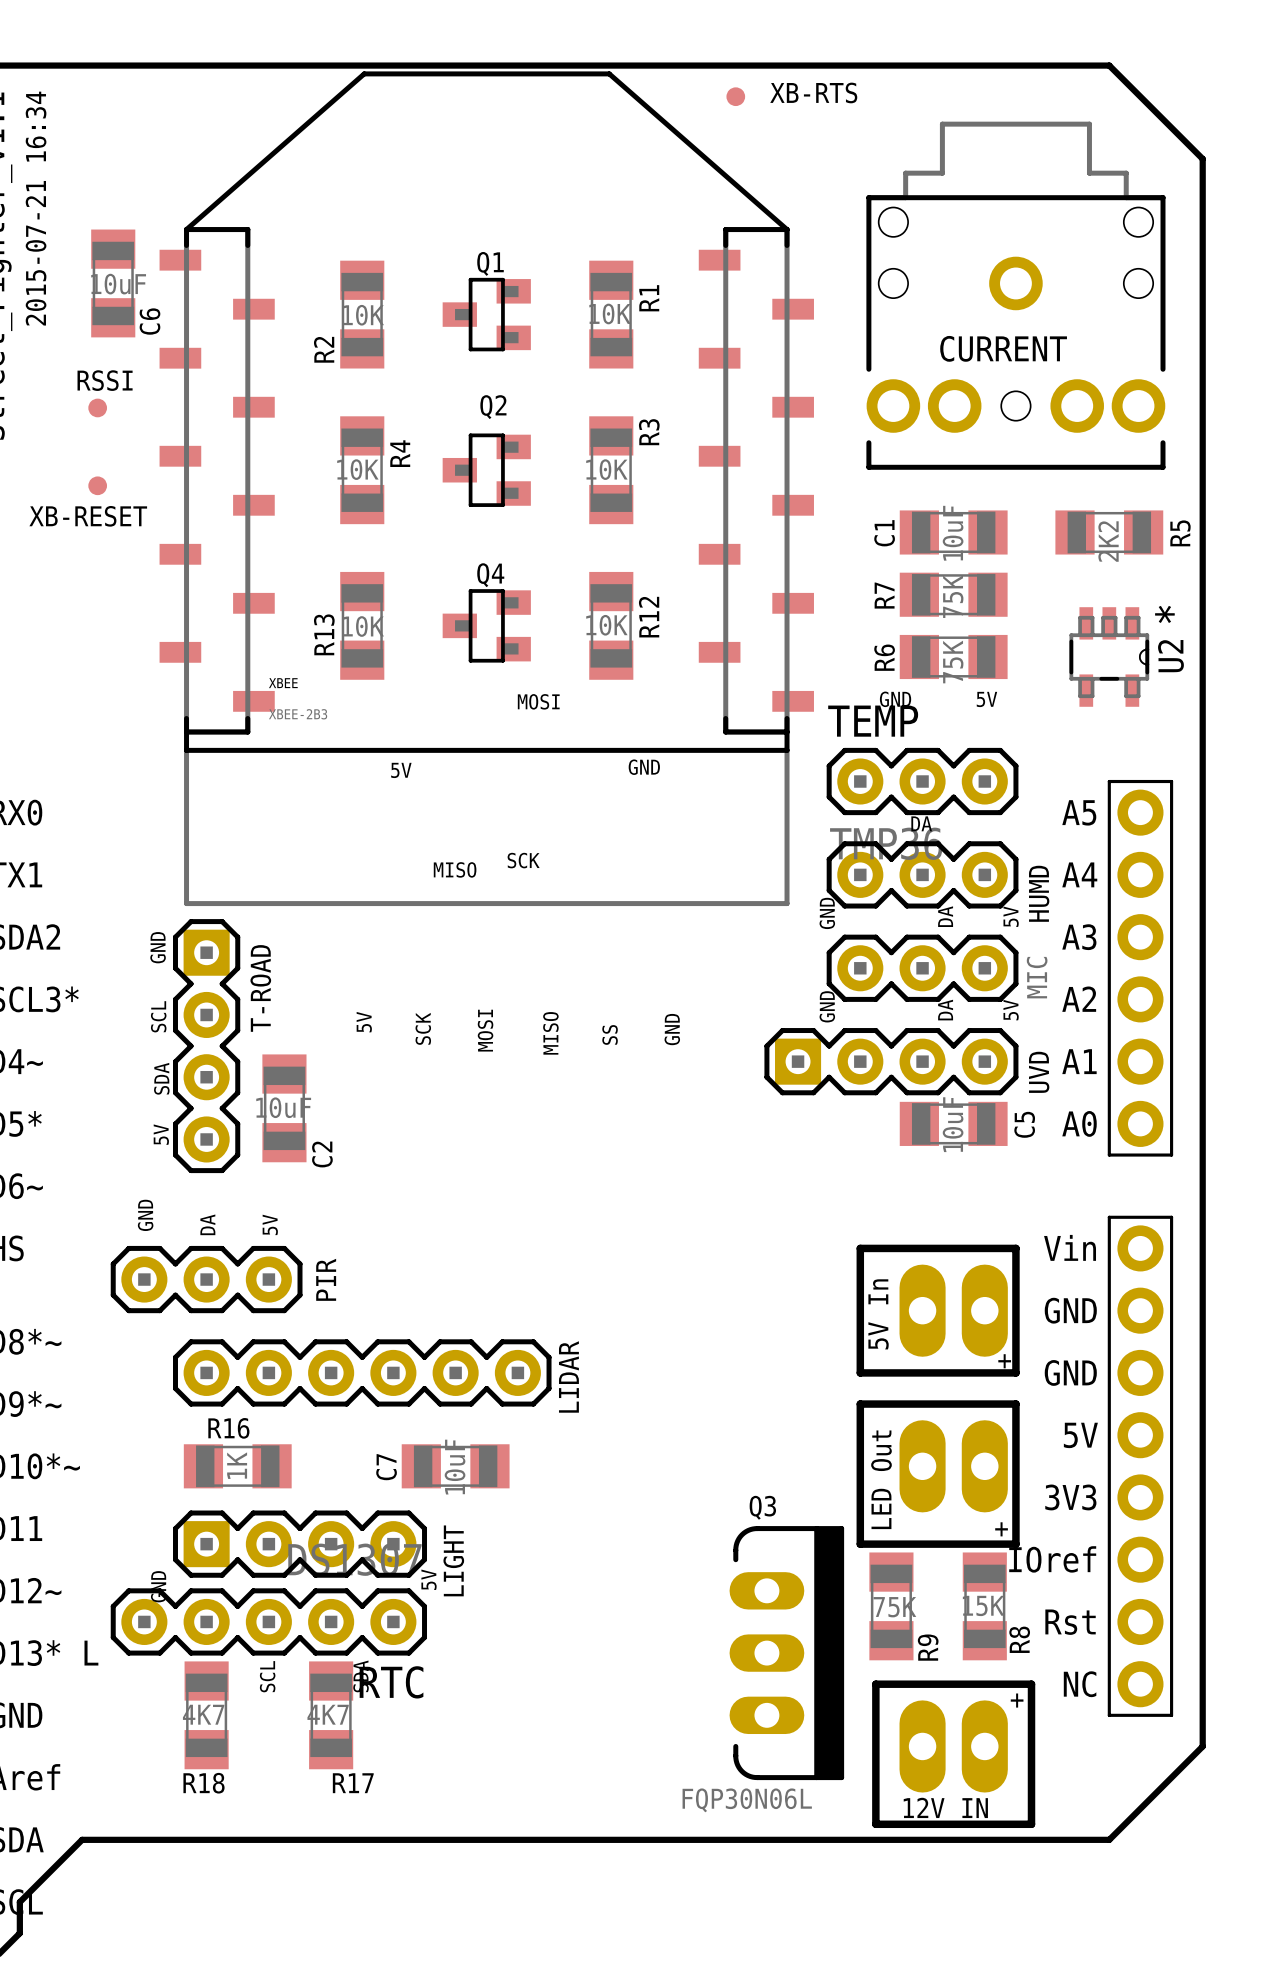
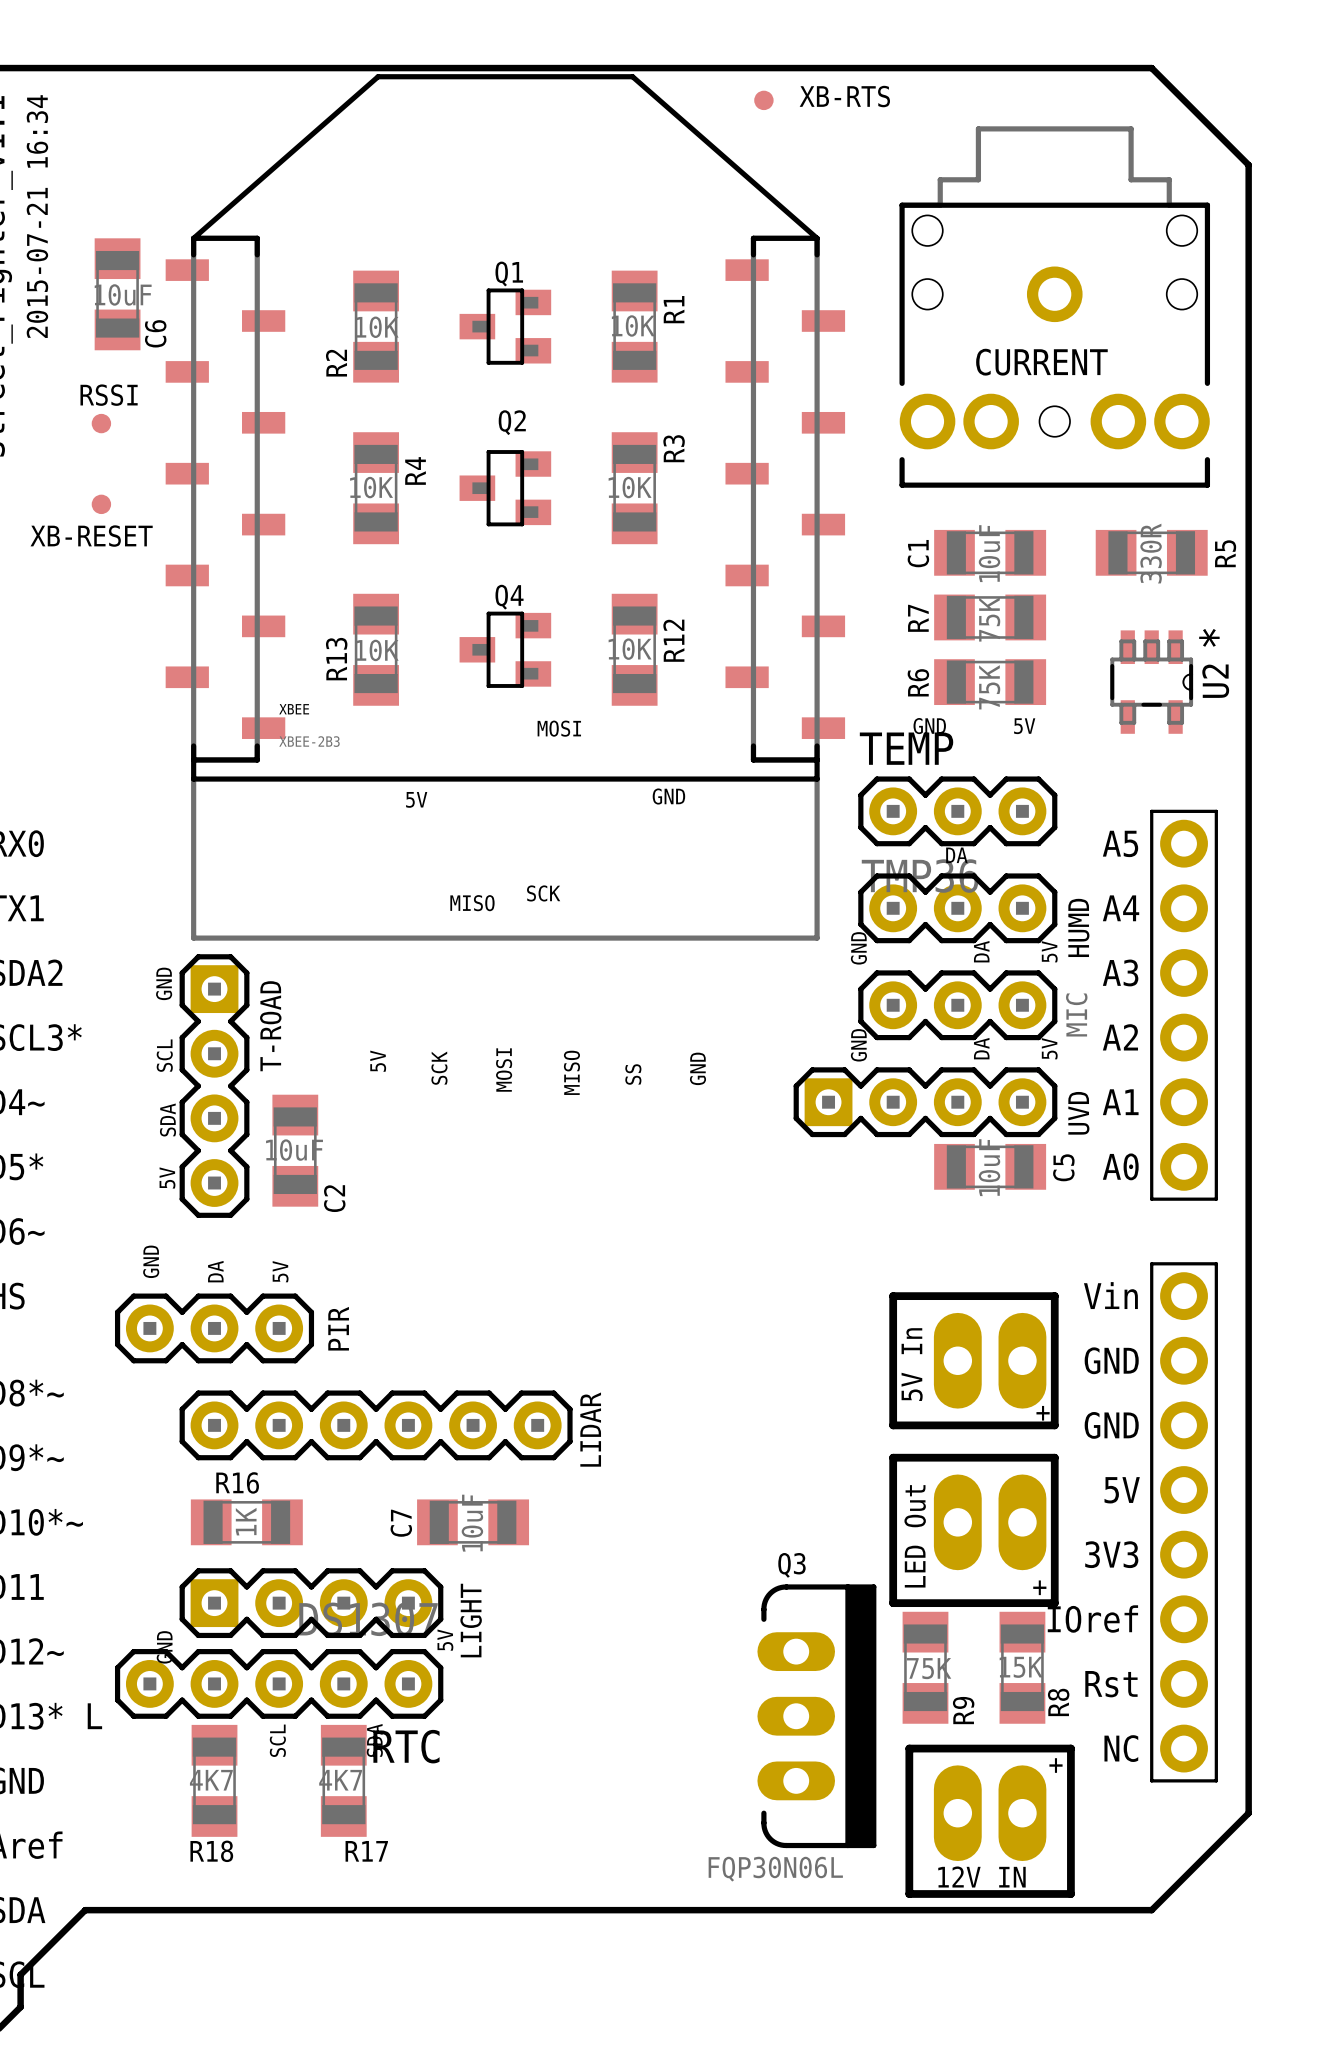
R5 value: 2K2 (1108, 541) -> 330R (1151, 553)

